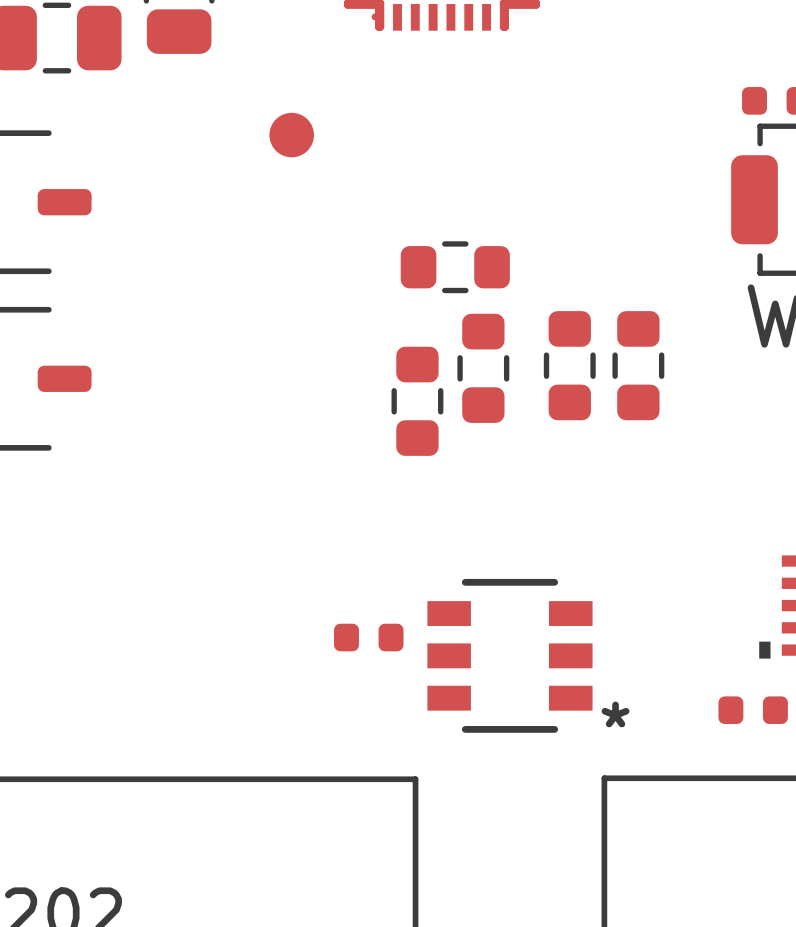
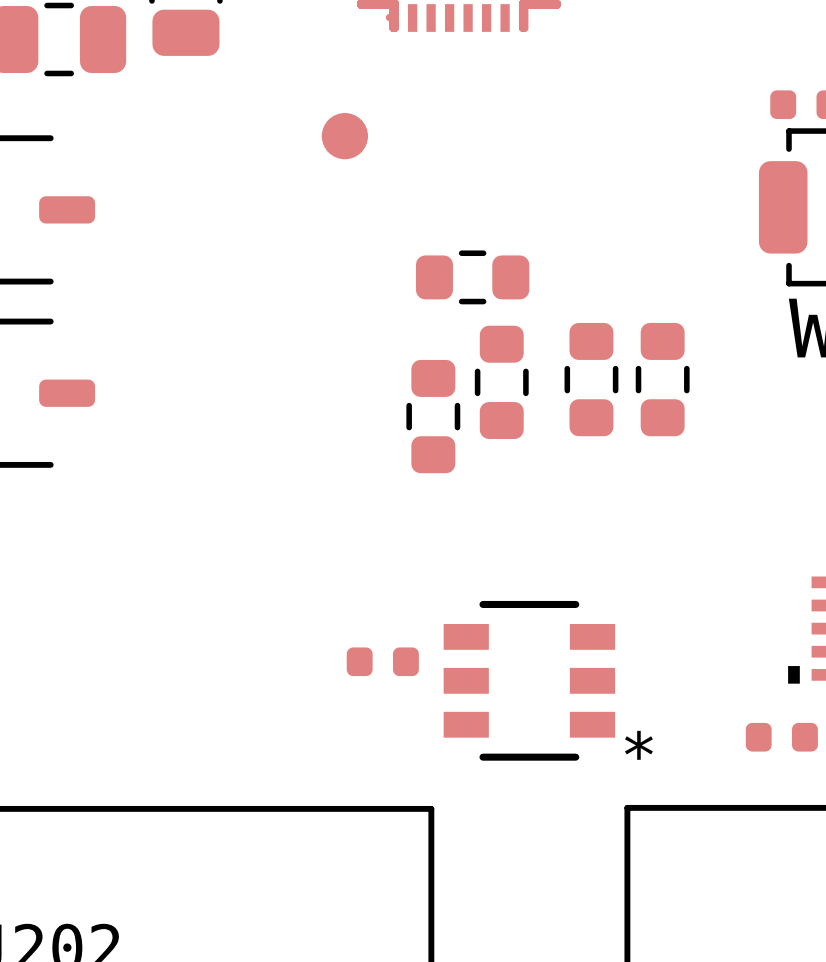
part position: (291, 135) -> (344, 136)

